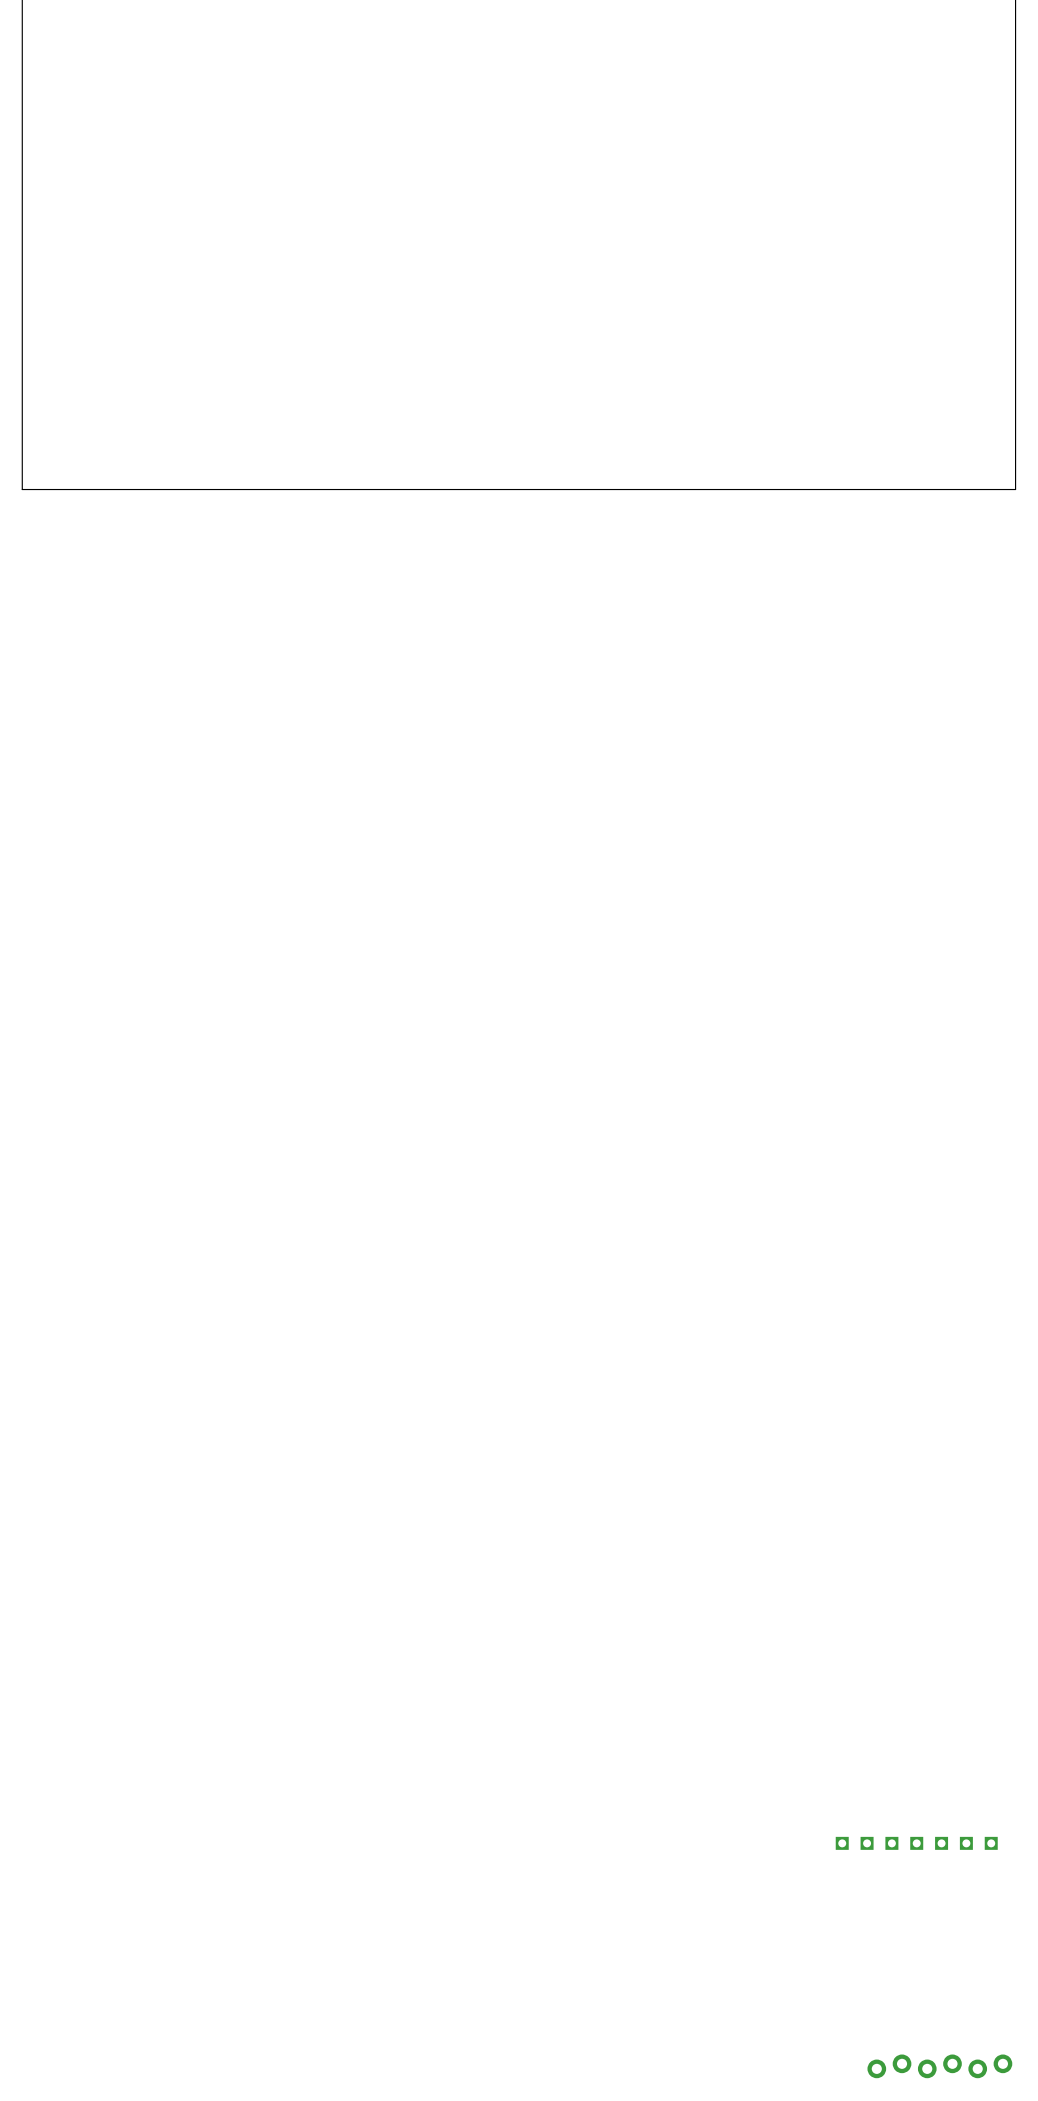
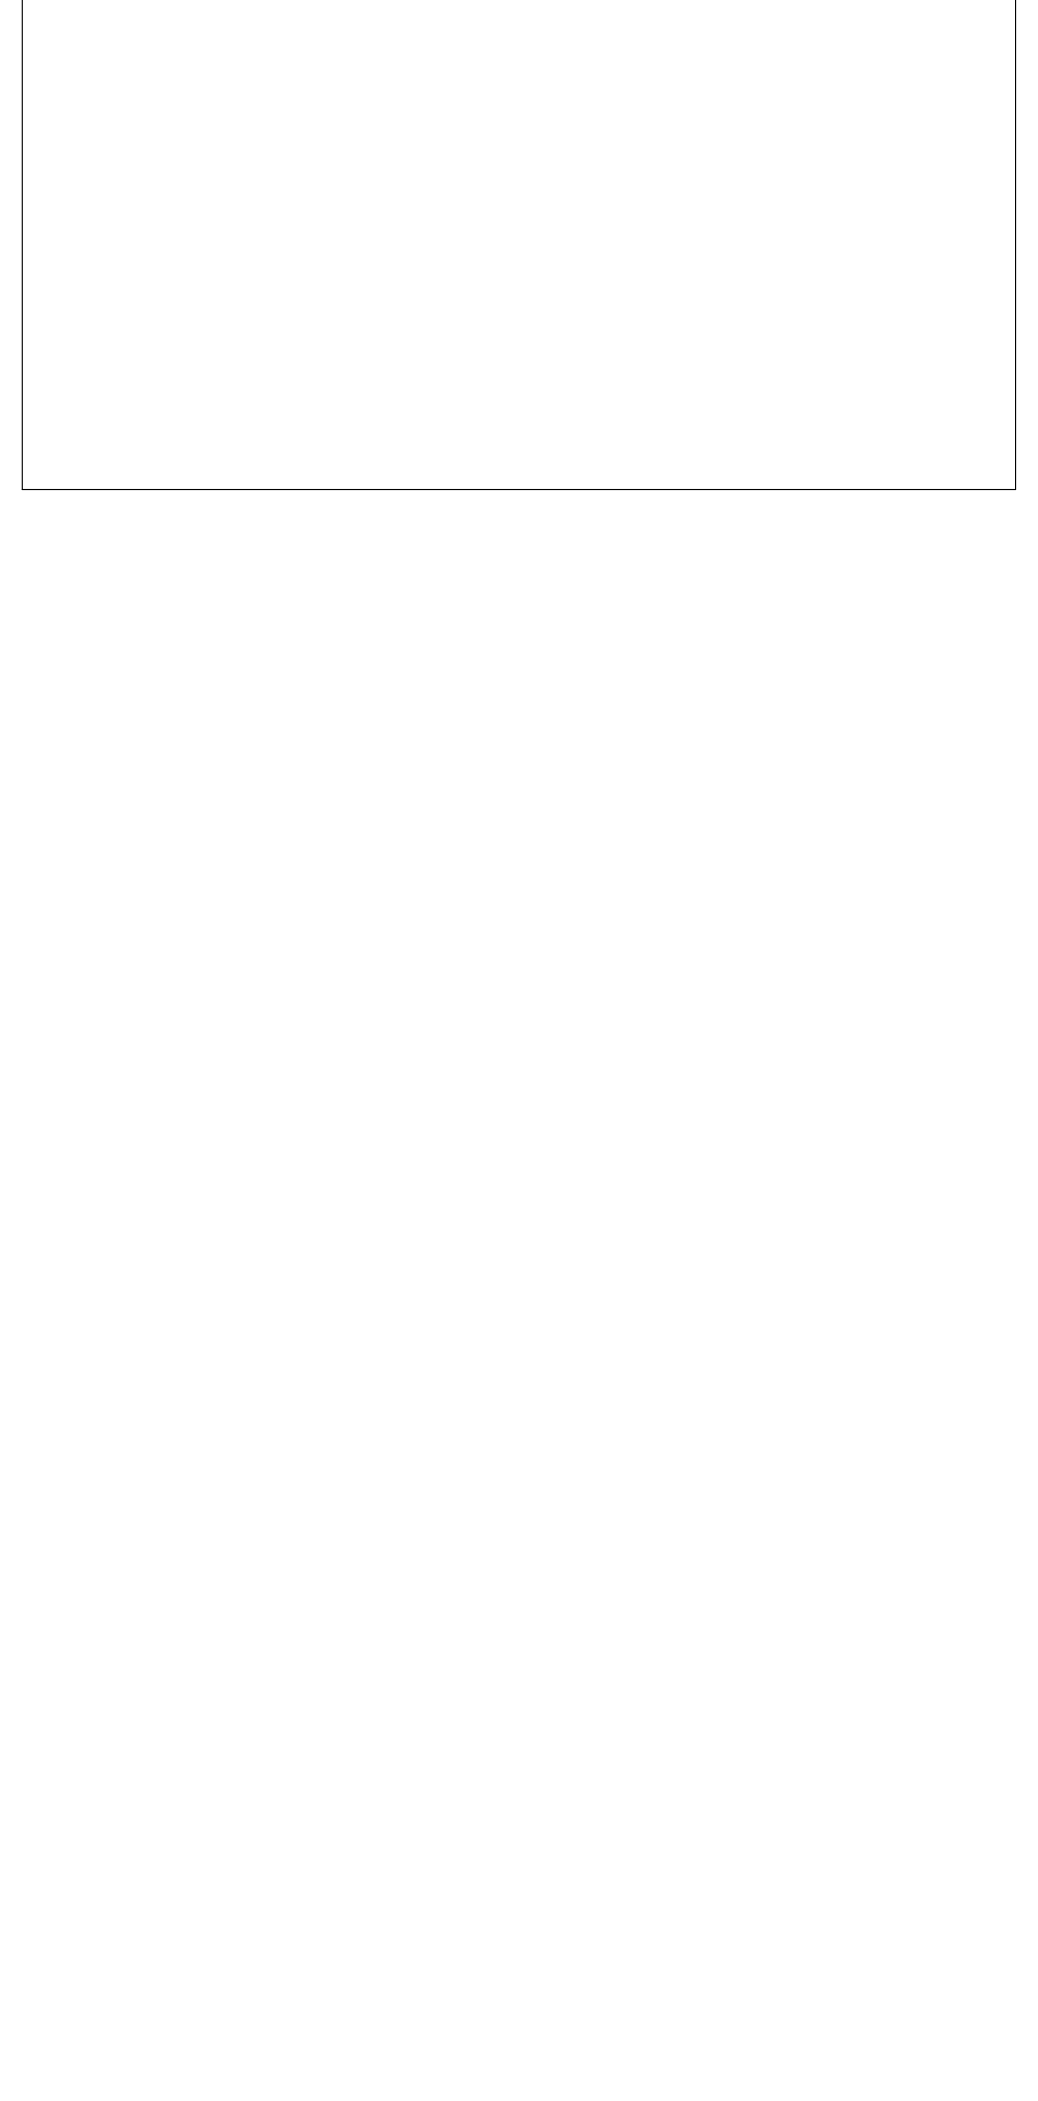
part: (916, 1843) -> none
part: (939, 2066) -> none

